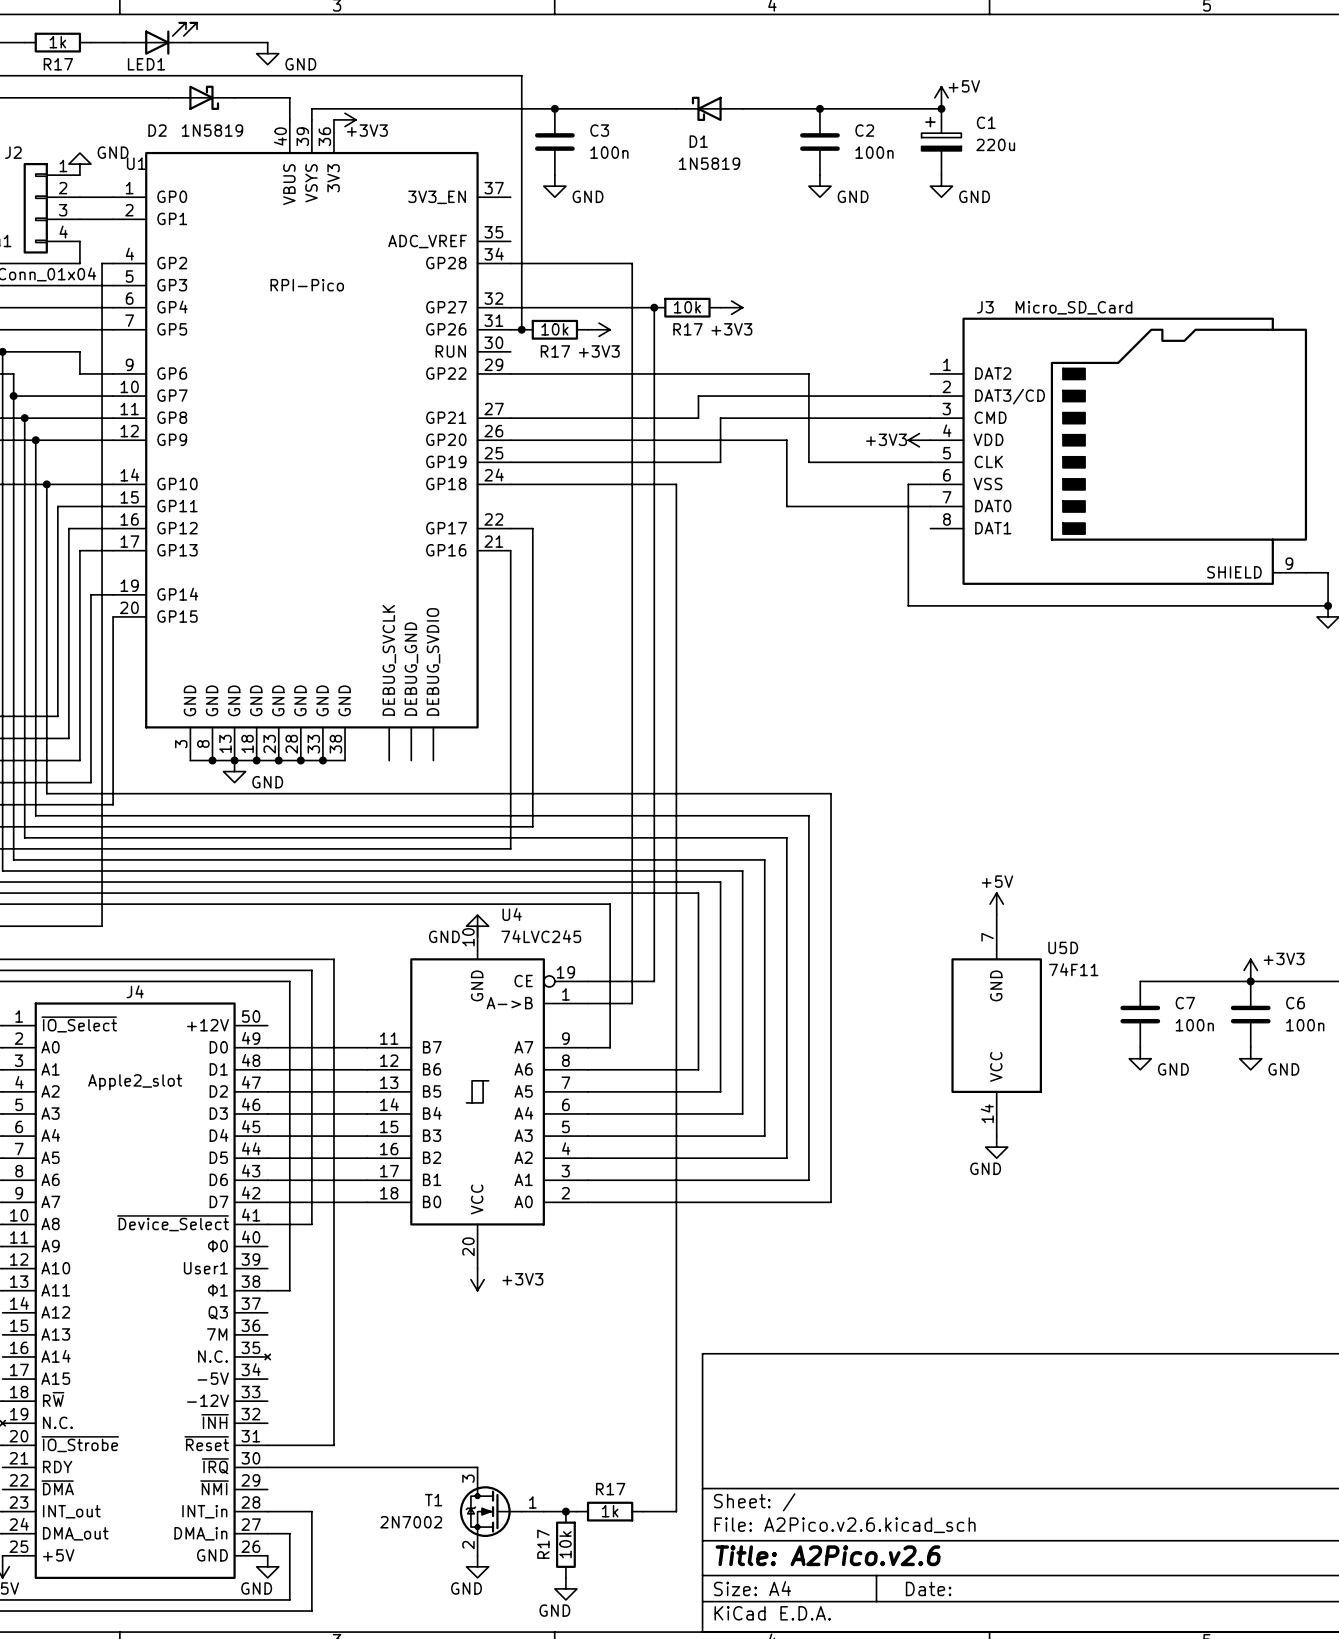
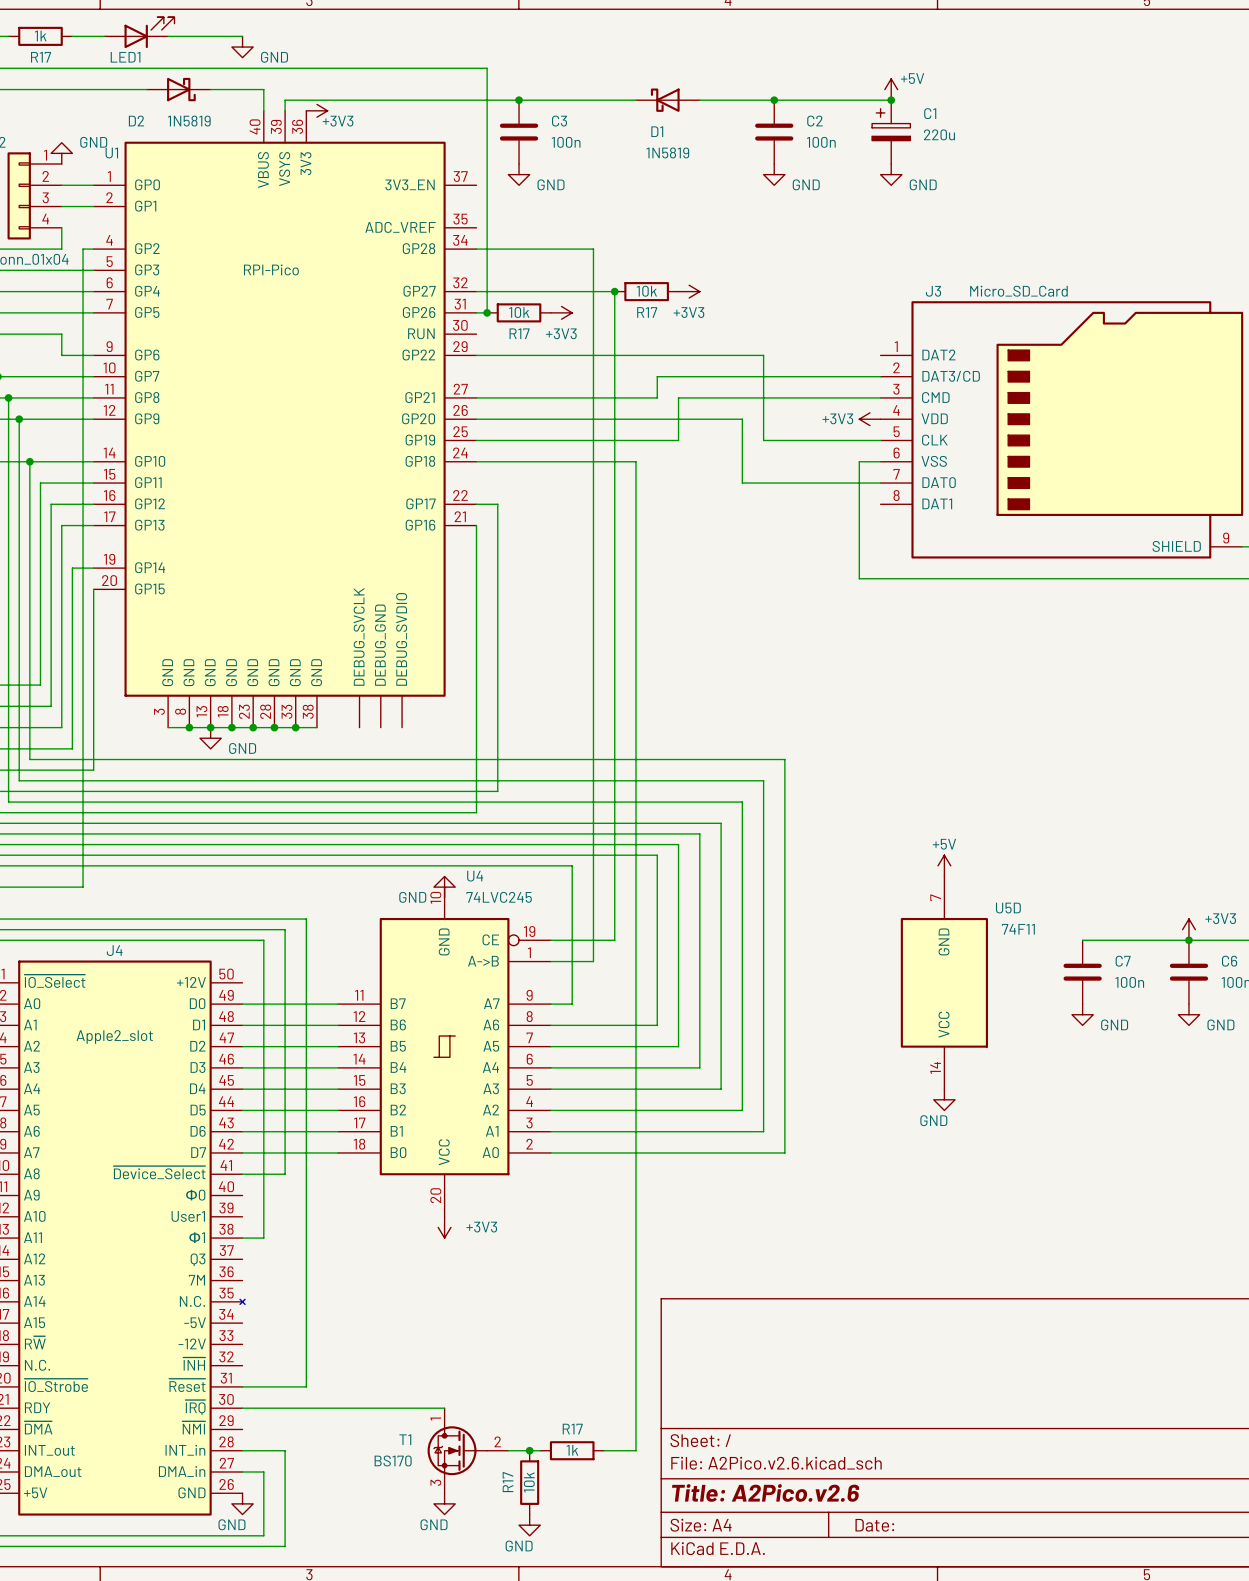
T1 pin number: 3 (468, 1478) -> 1 (435, 1419)
T1 pin number: 1 (532, 1502) -> 2 (497, 1441)
T1 value: 2N7002 (411, 1522) -> BS170 (393, 1460)
T1 pin number: 2 (468, 1545) -> 3 (435, 1482)

